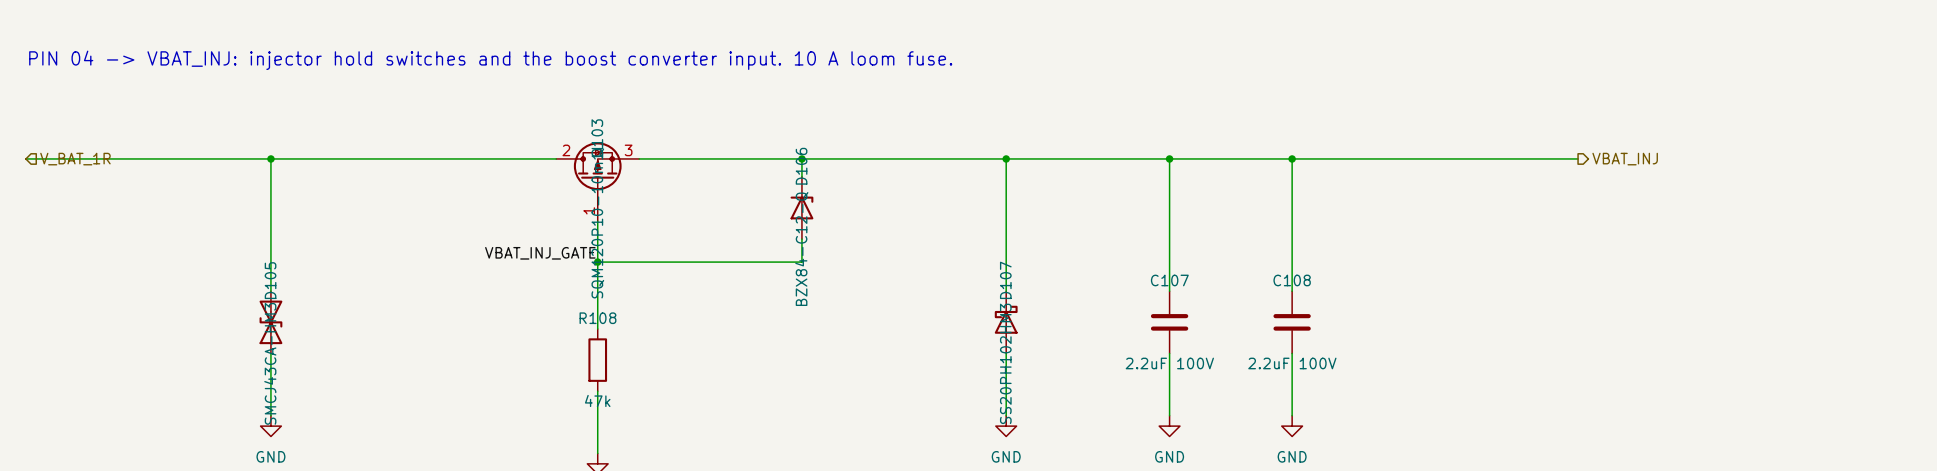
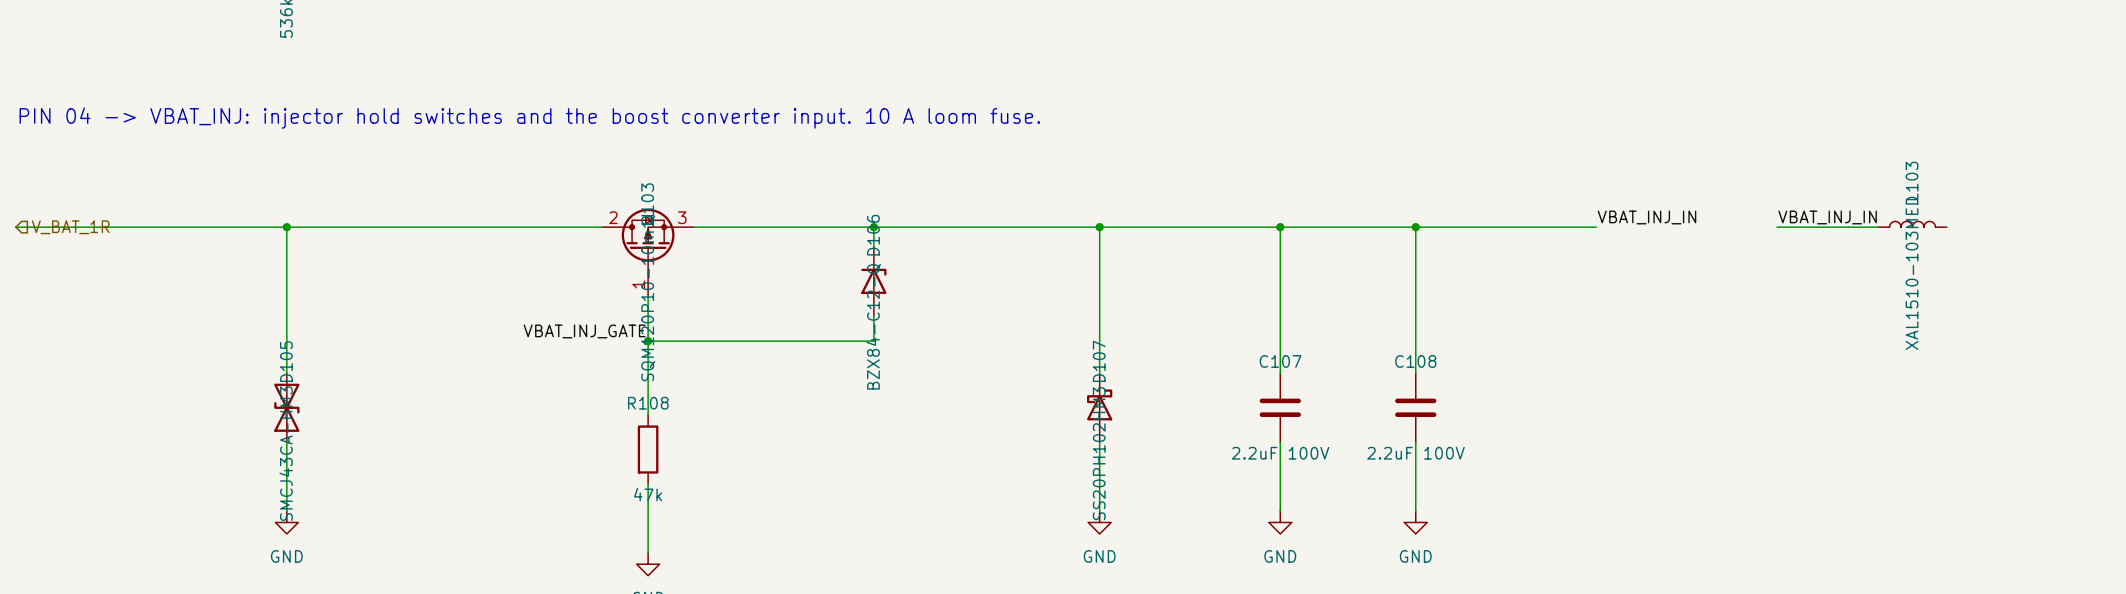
label: none -> VBAT_INJ_IN (1646, 217)
label: none -> VBAT_INJ_IN (1827, 217)
L103: none -> XAL1510-103MED (1912, 224)
wire: (1455, 158) (1578, 158) -> none
wire: none -> (1777, 227) (1878, 227)
hierarchical label: VBAT_INJ (1625, 159) -> none

